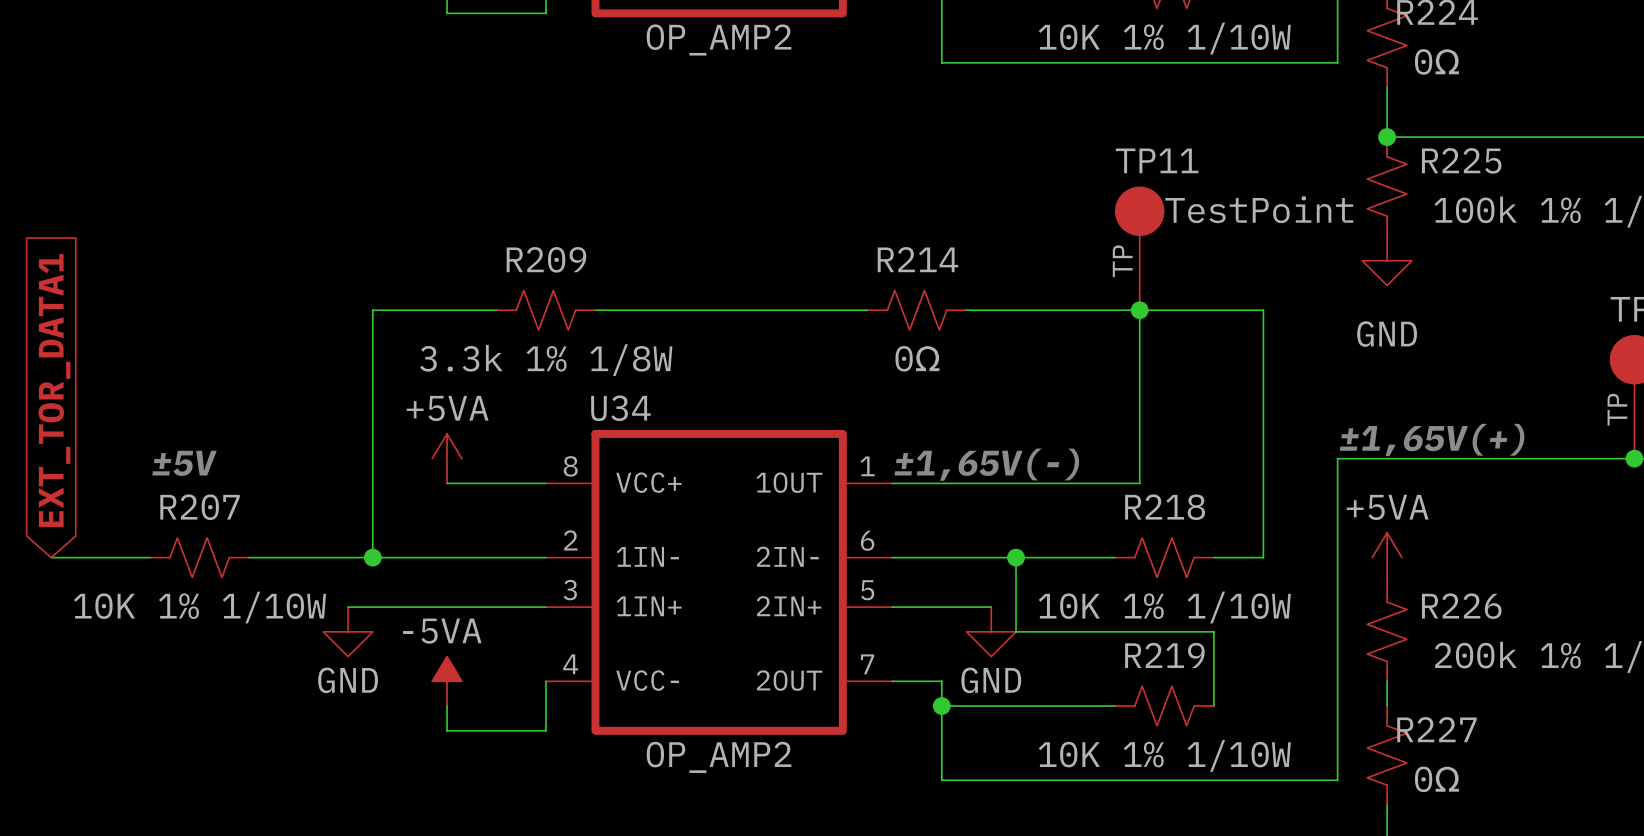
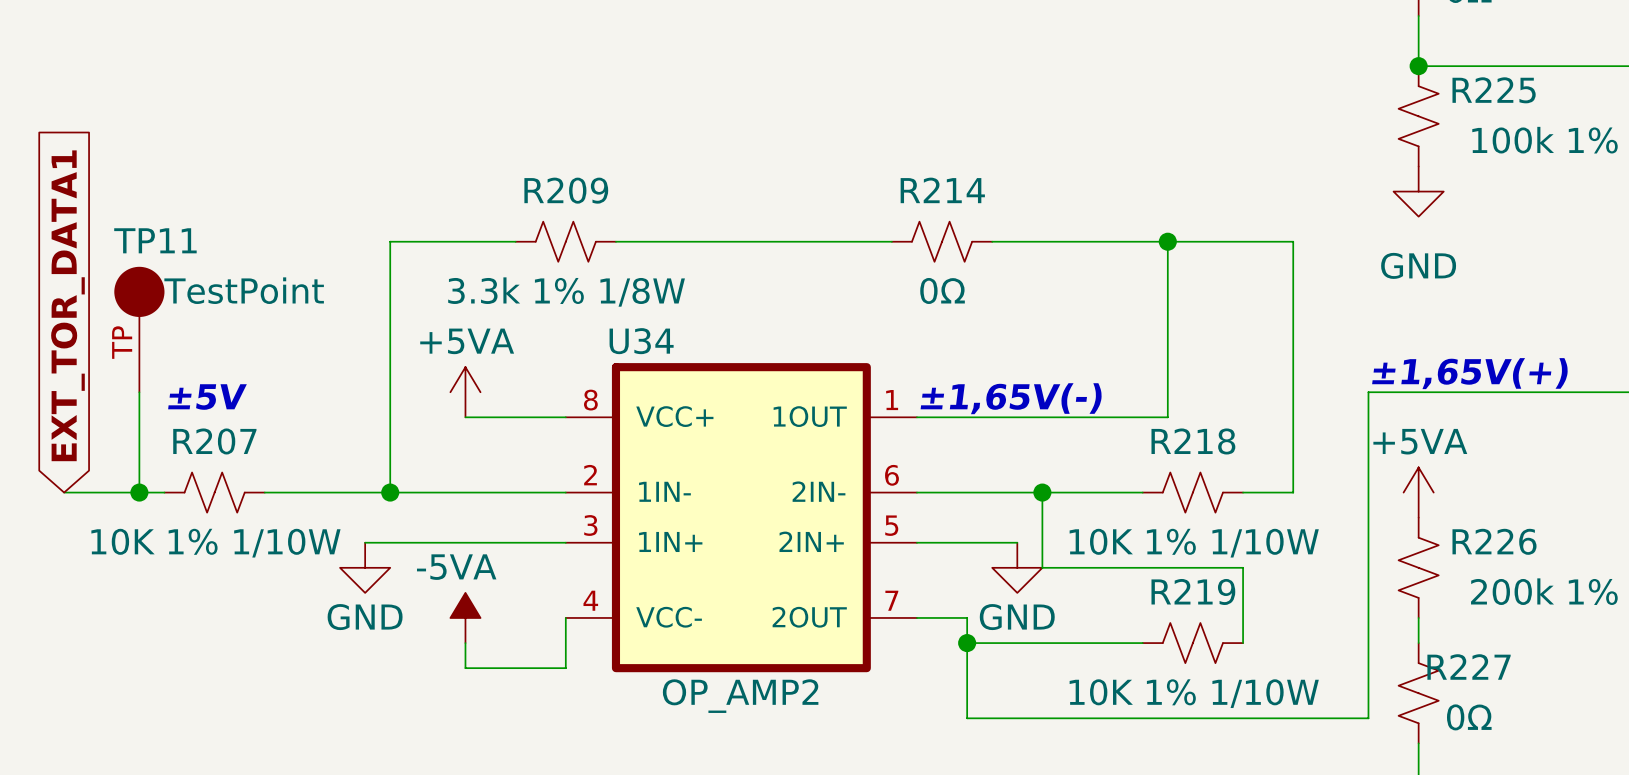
TP11 position: (1139, 248) -> (139, 329)
wire: none -> (139, 392) (139, 492)
junction: none -> (139, 492)

